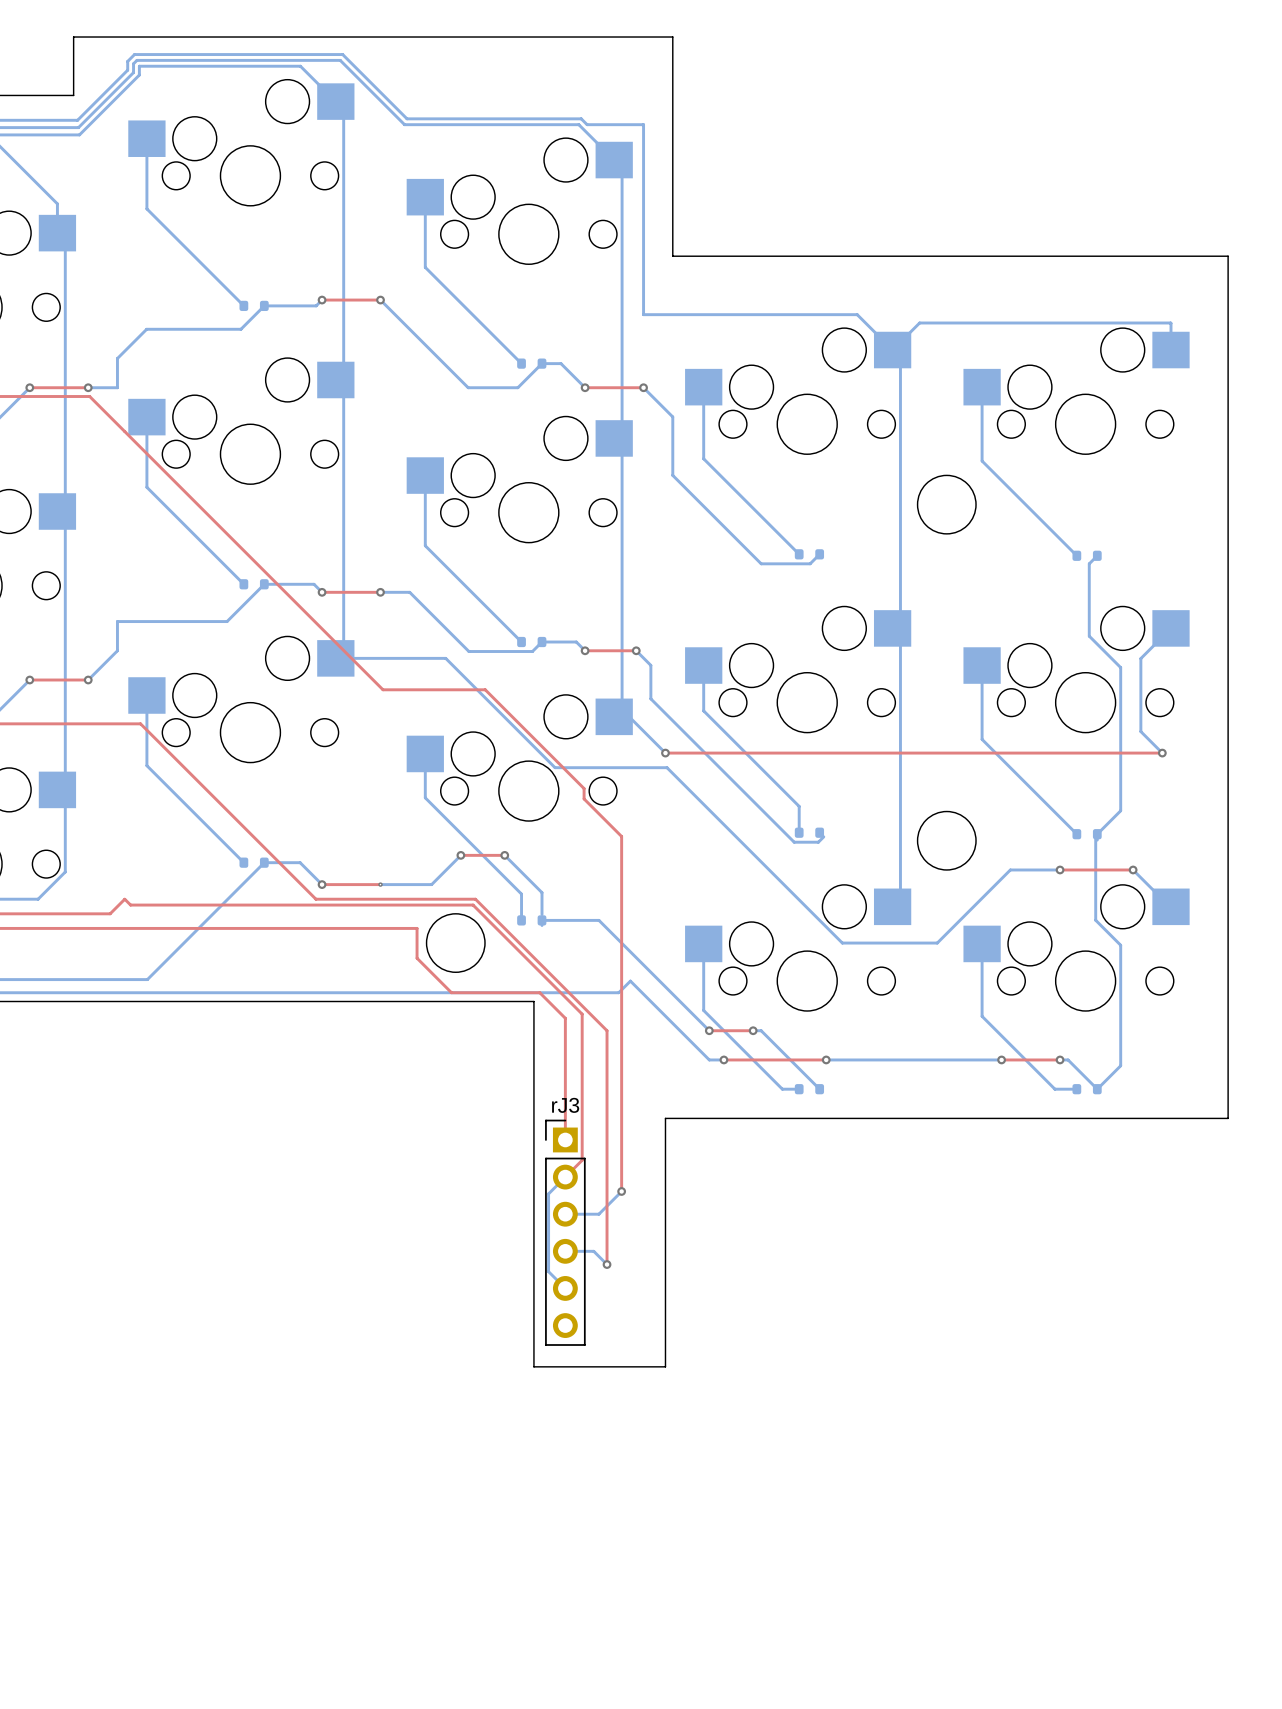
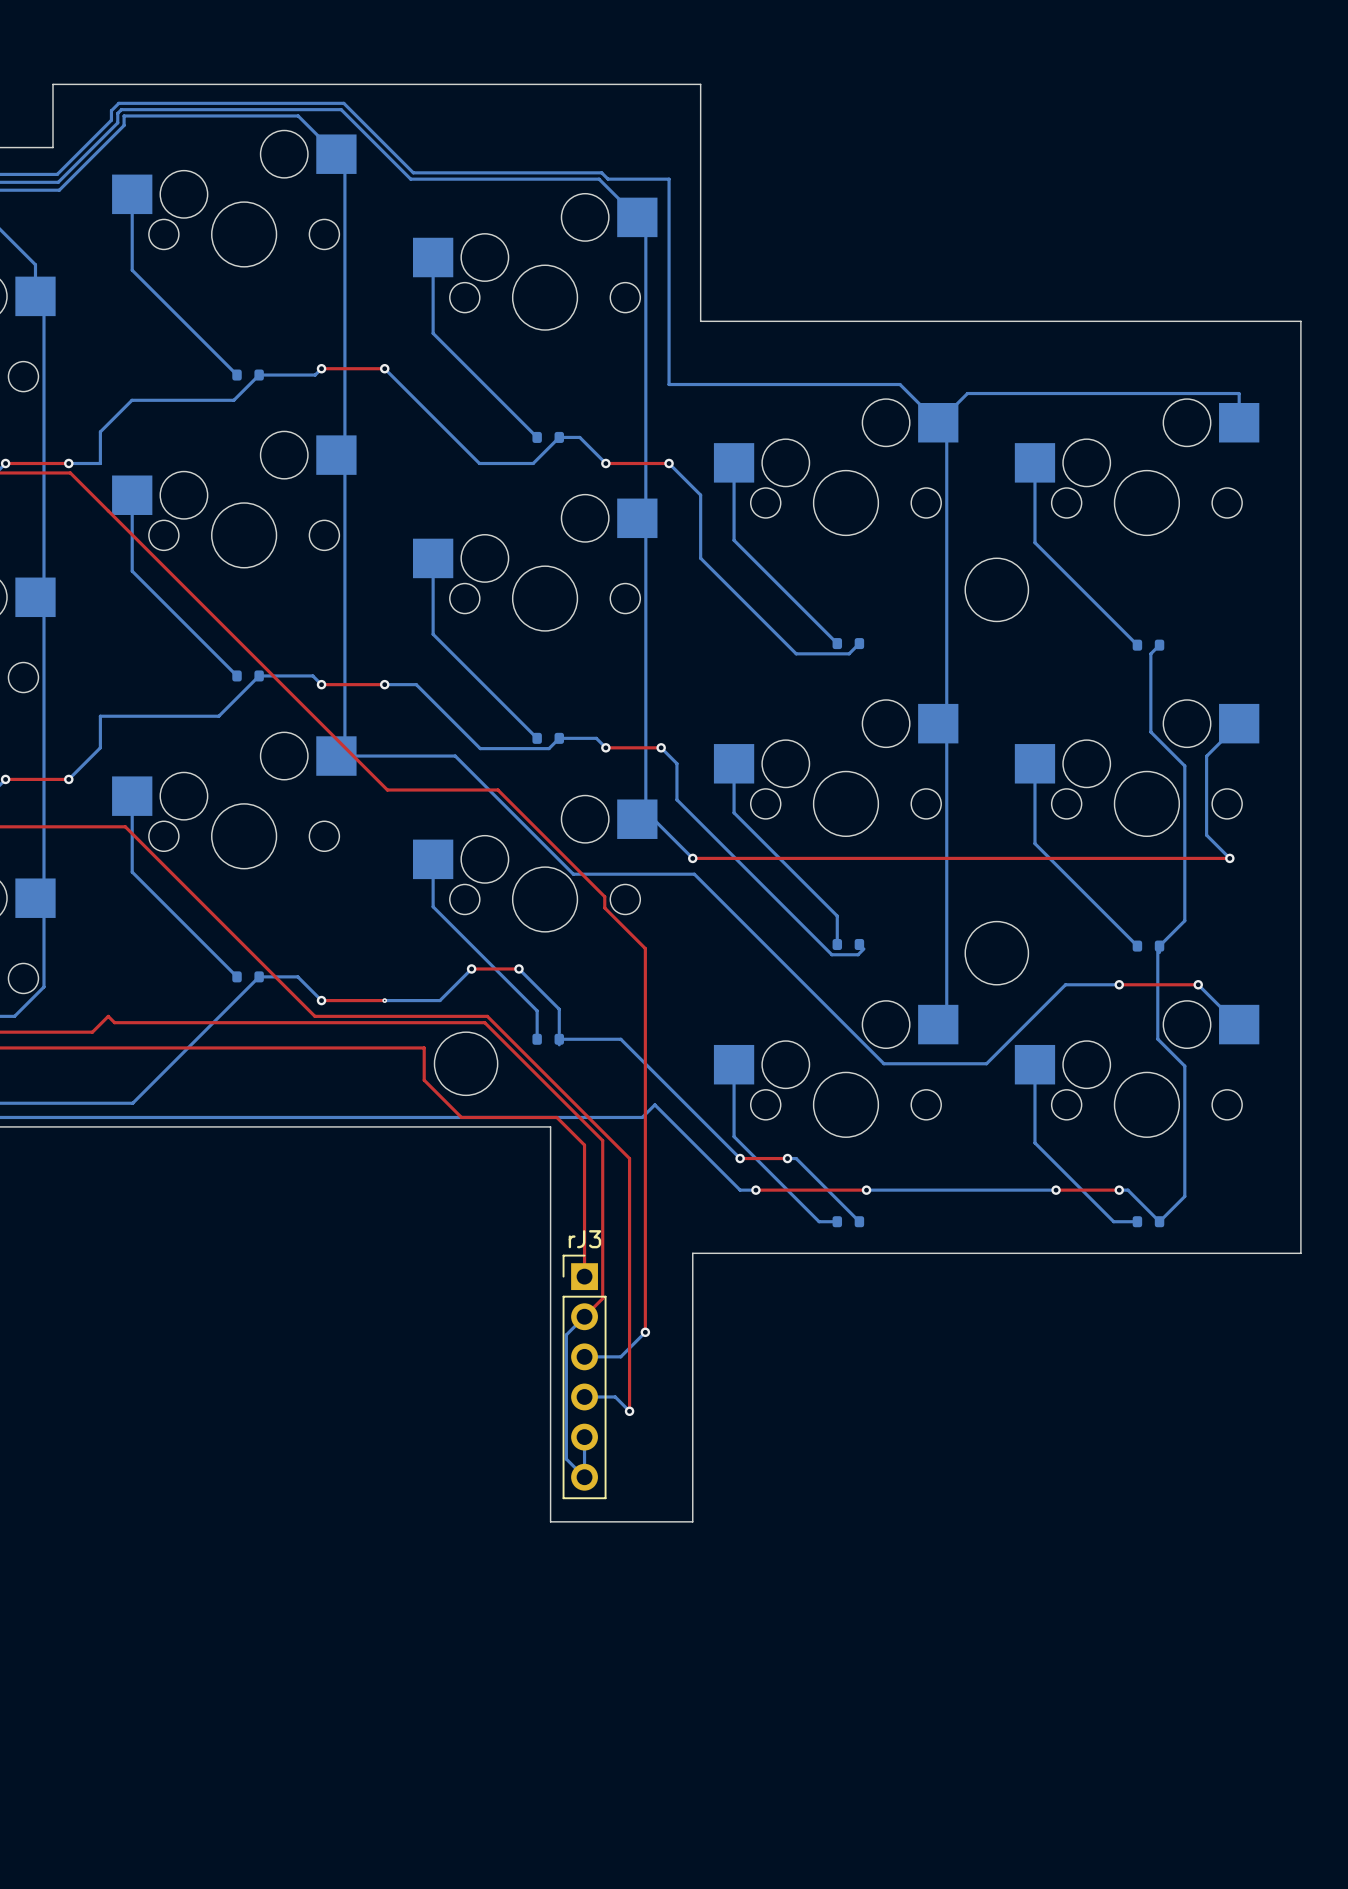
bottom track: (548, 1271) (565, 1288) -> (566, 1418) (566, 1459) (584, 1477) (584, 1437)

